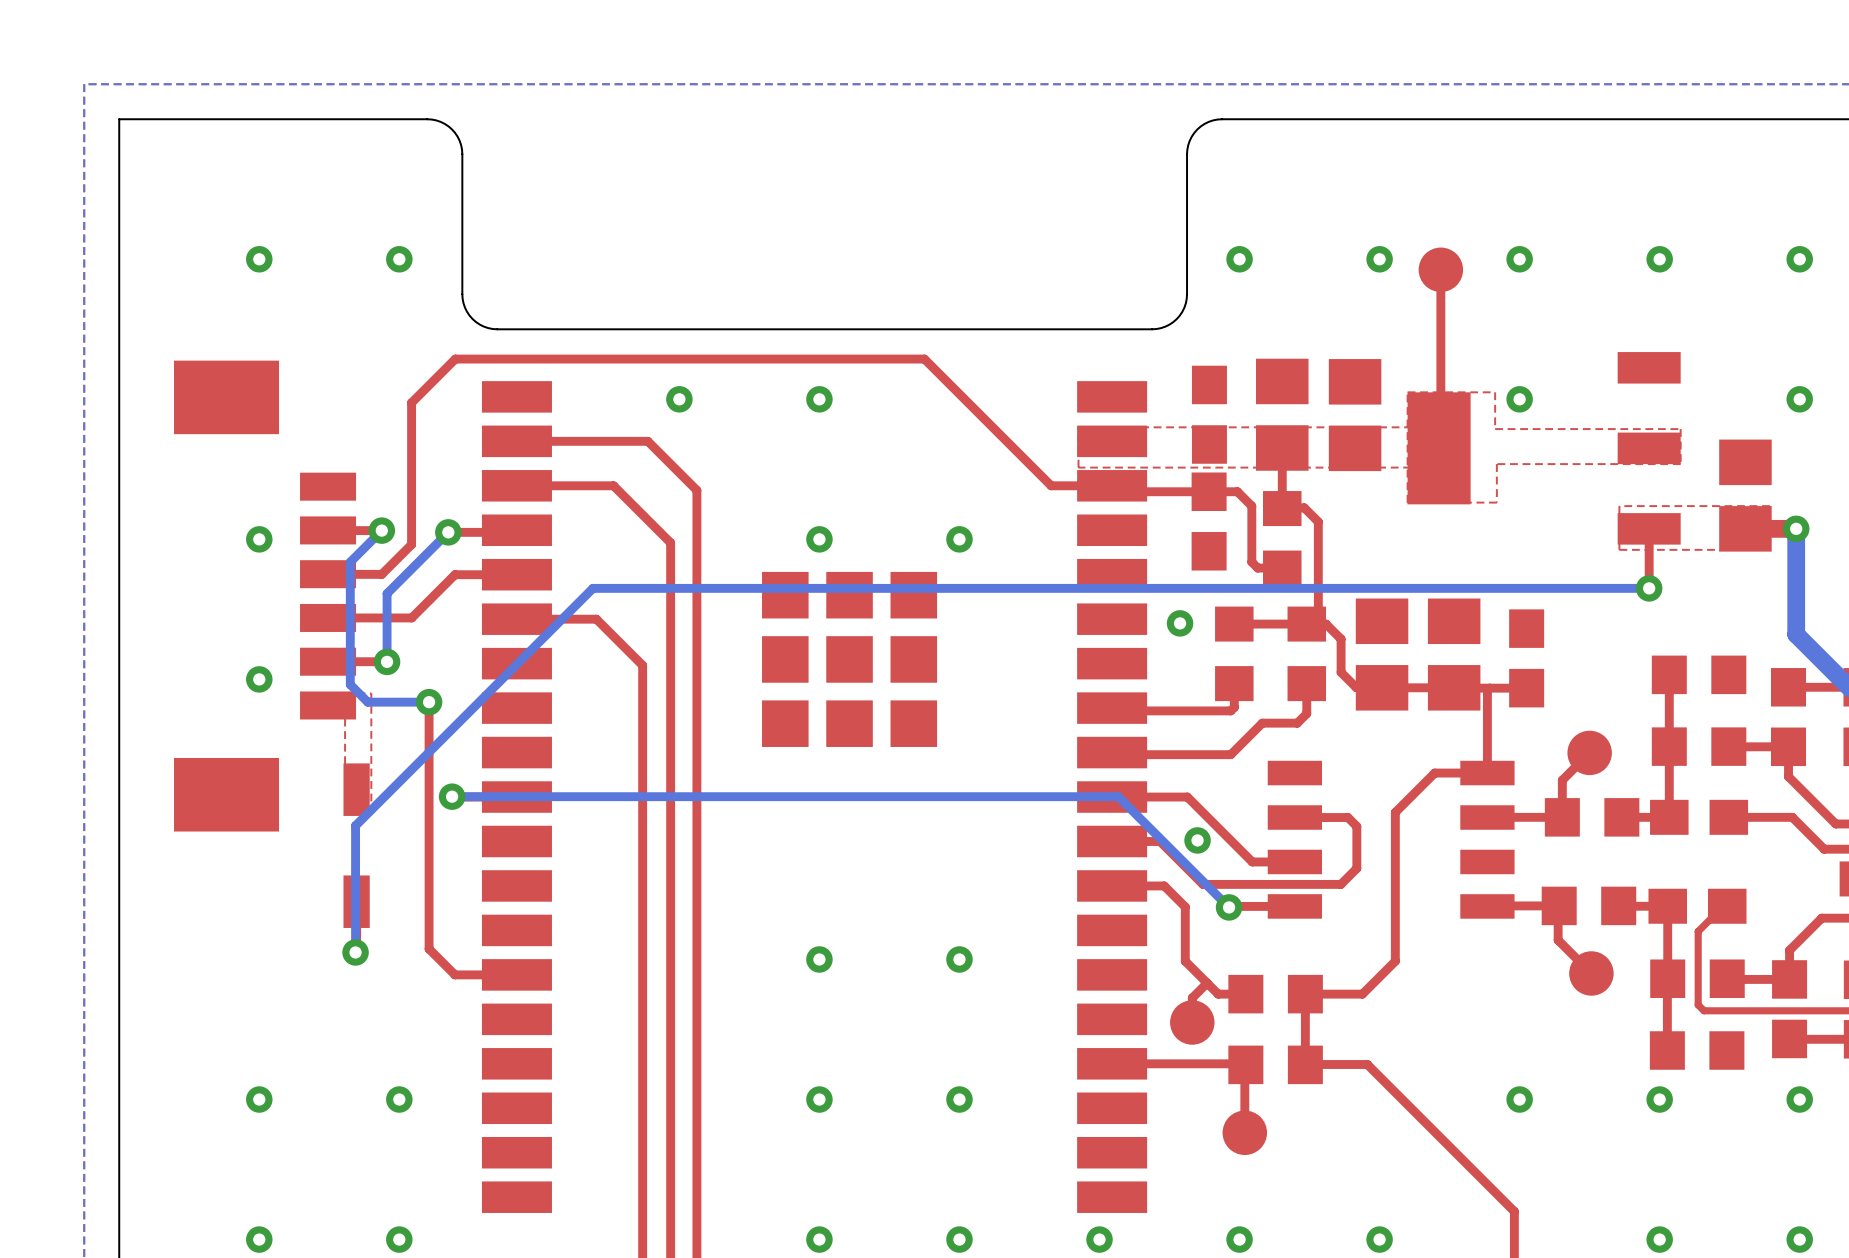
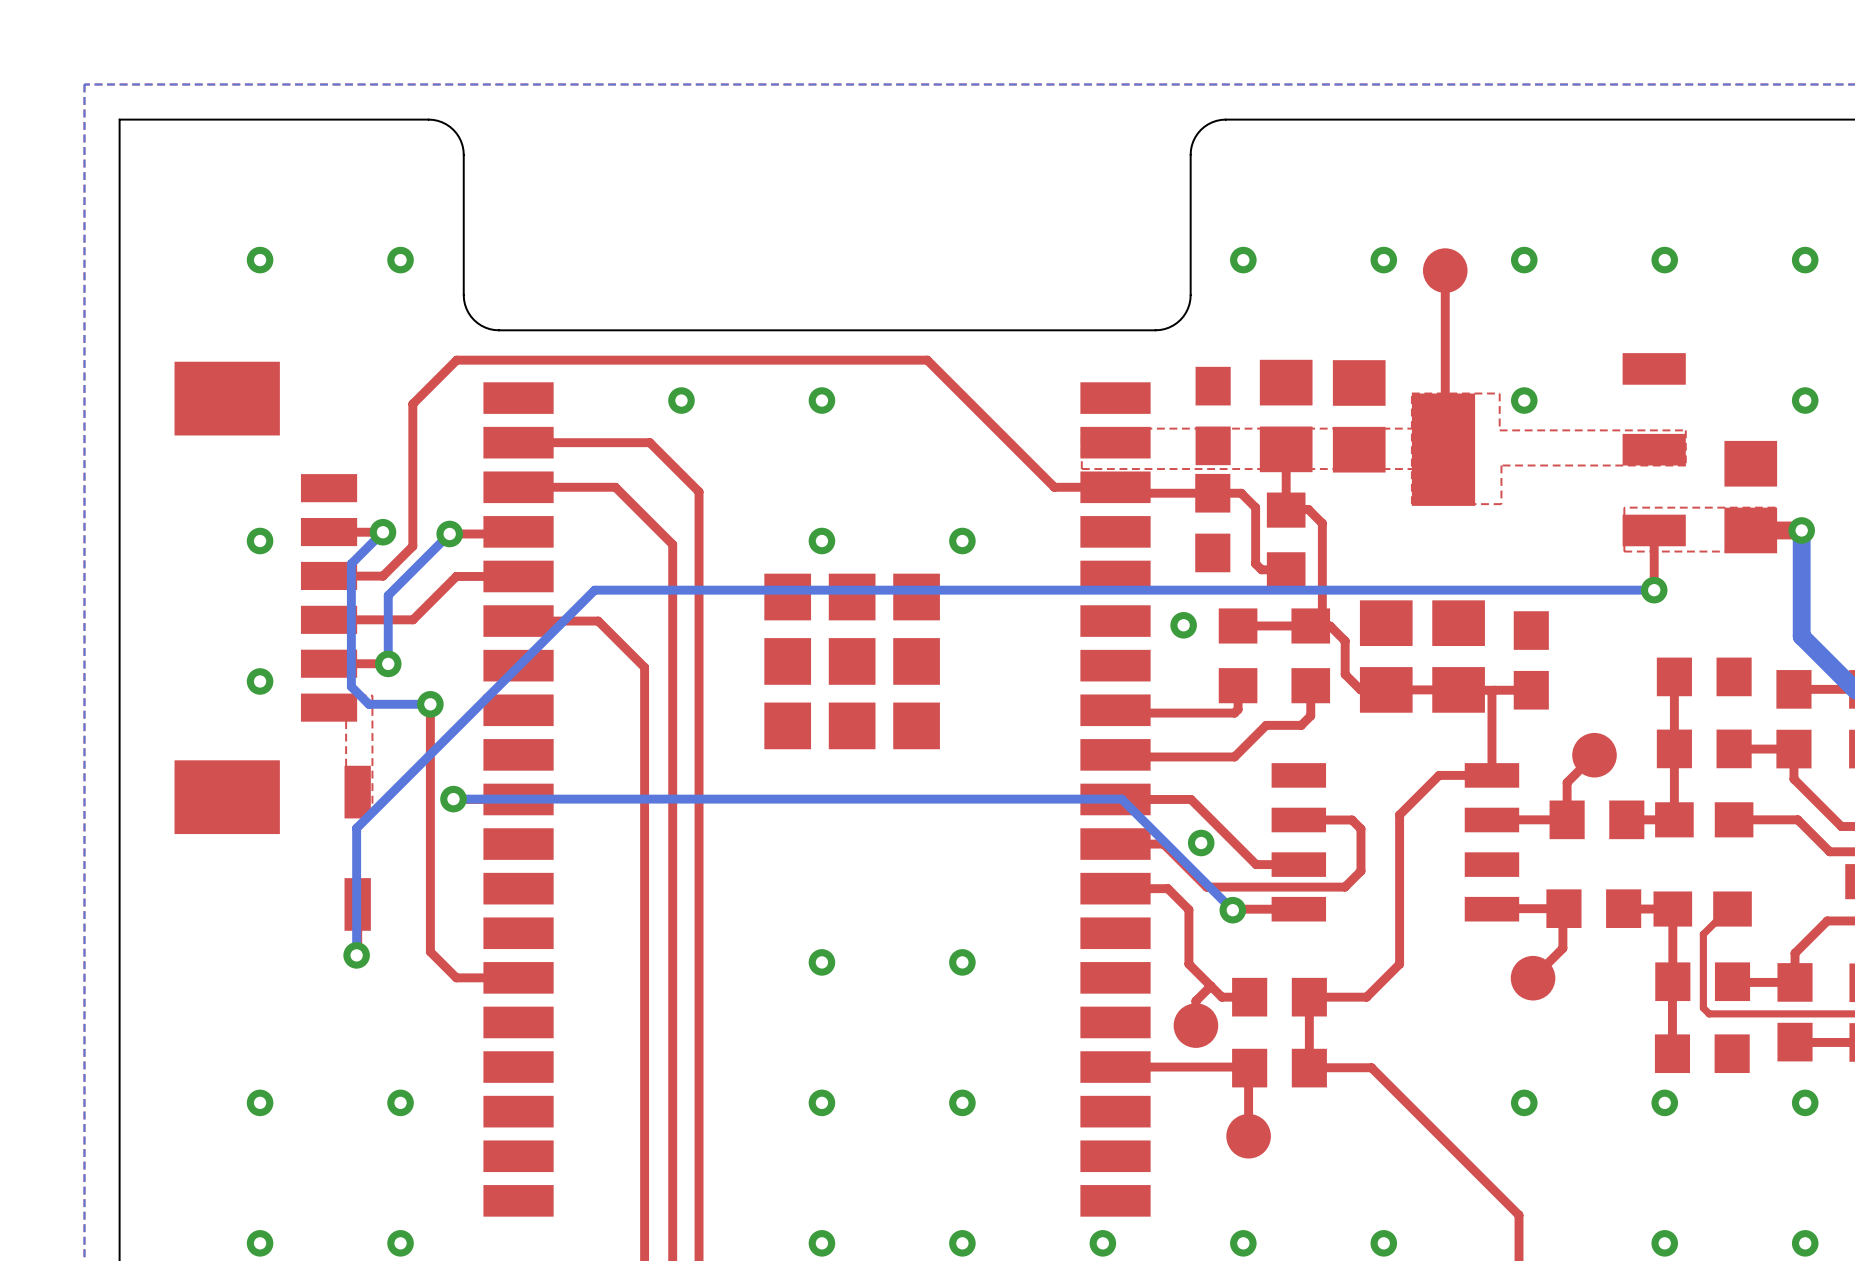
top track: (1558, 940) (1591, 973) -> (1562, 943) (1562, 948) (1533, 978)
part position: (1591, 973) -> (1533, 978)

